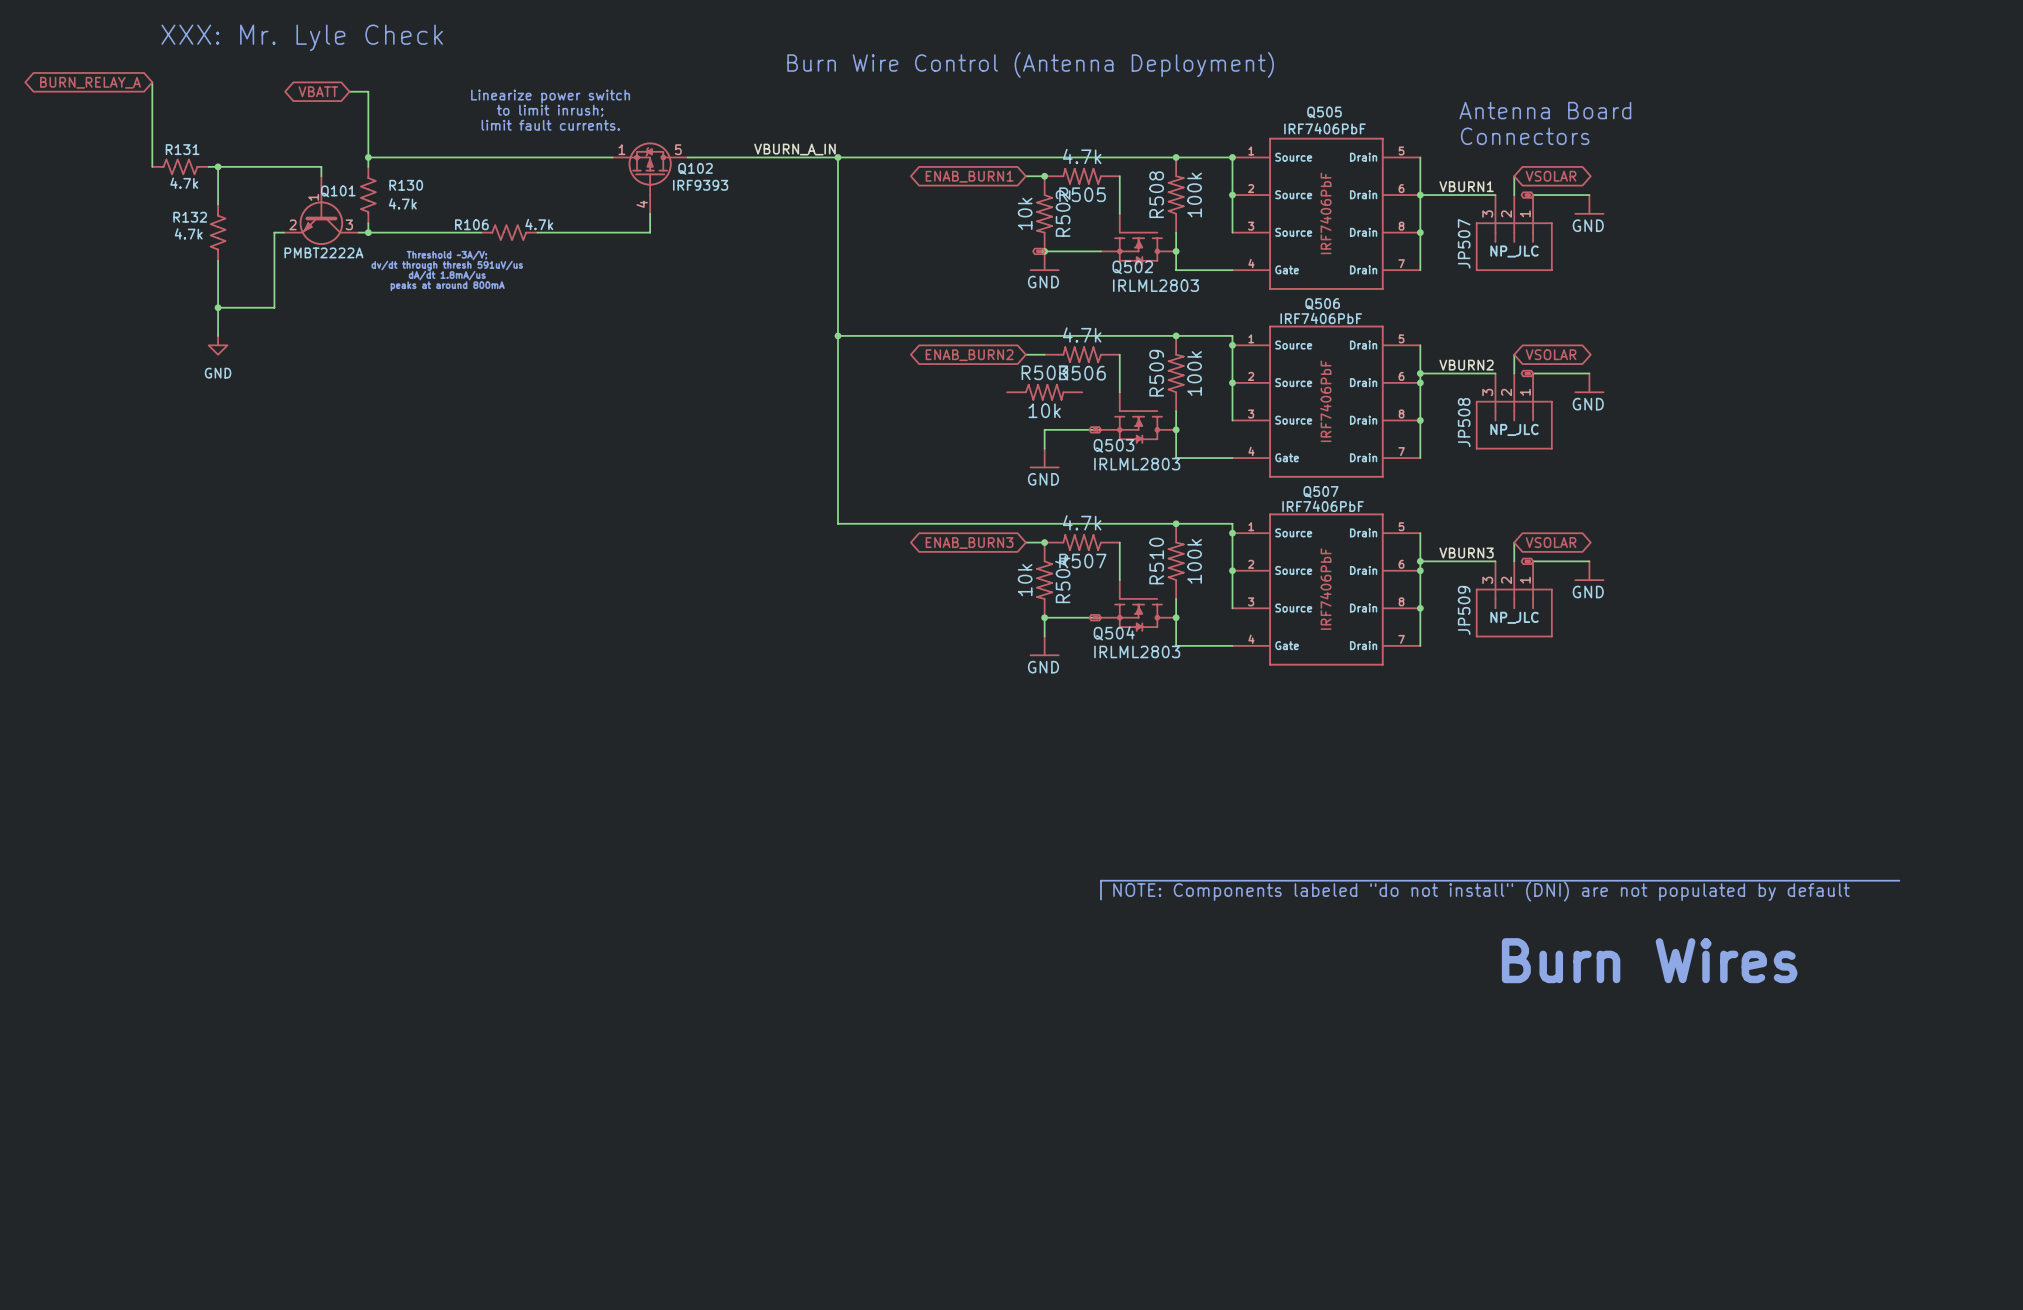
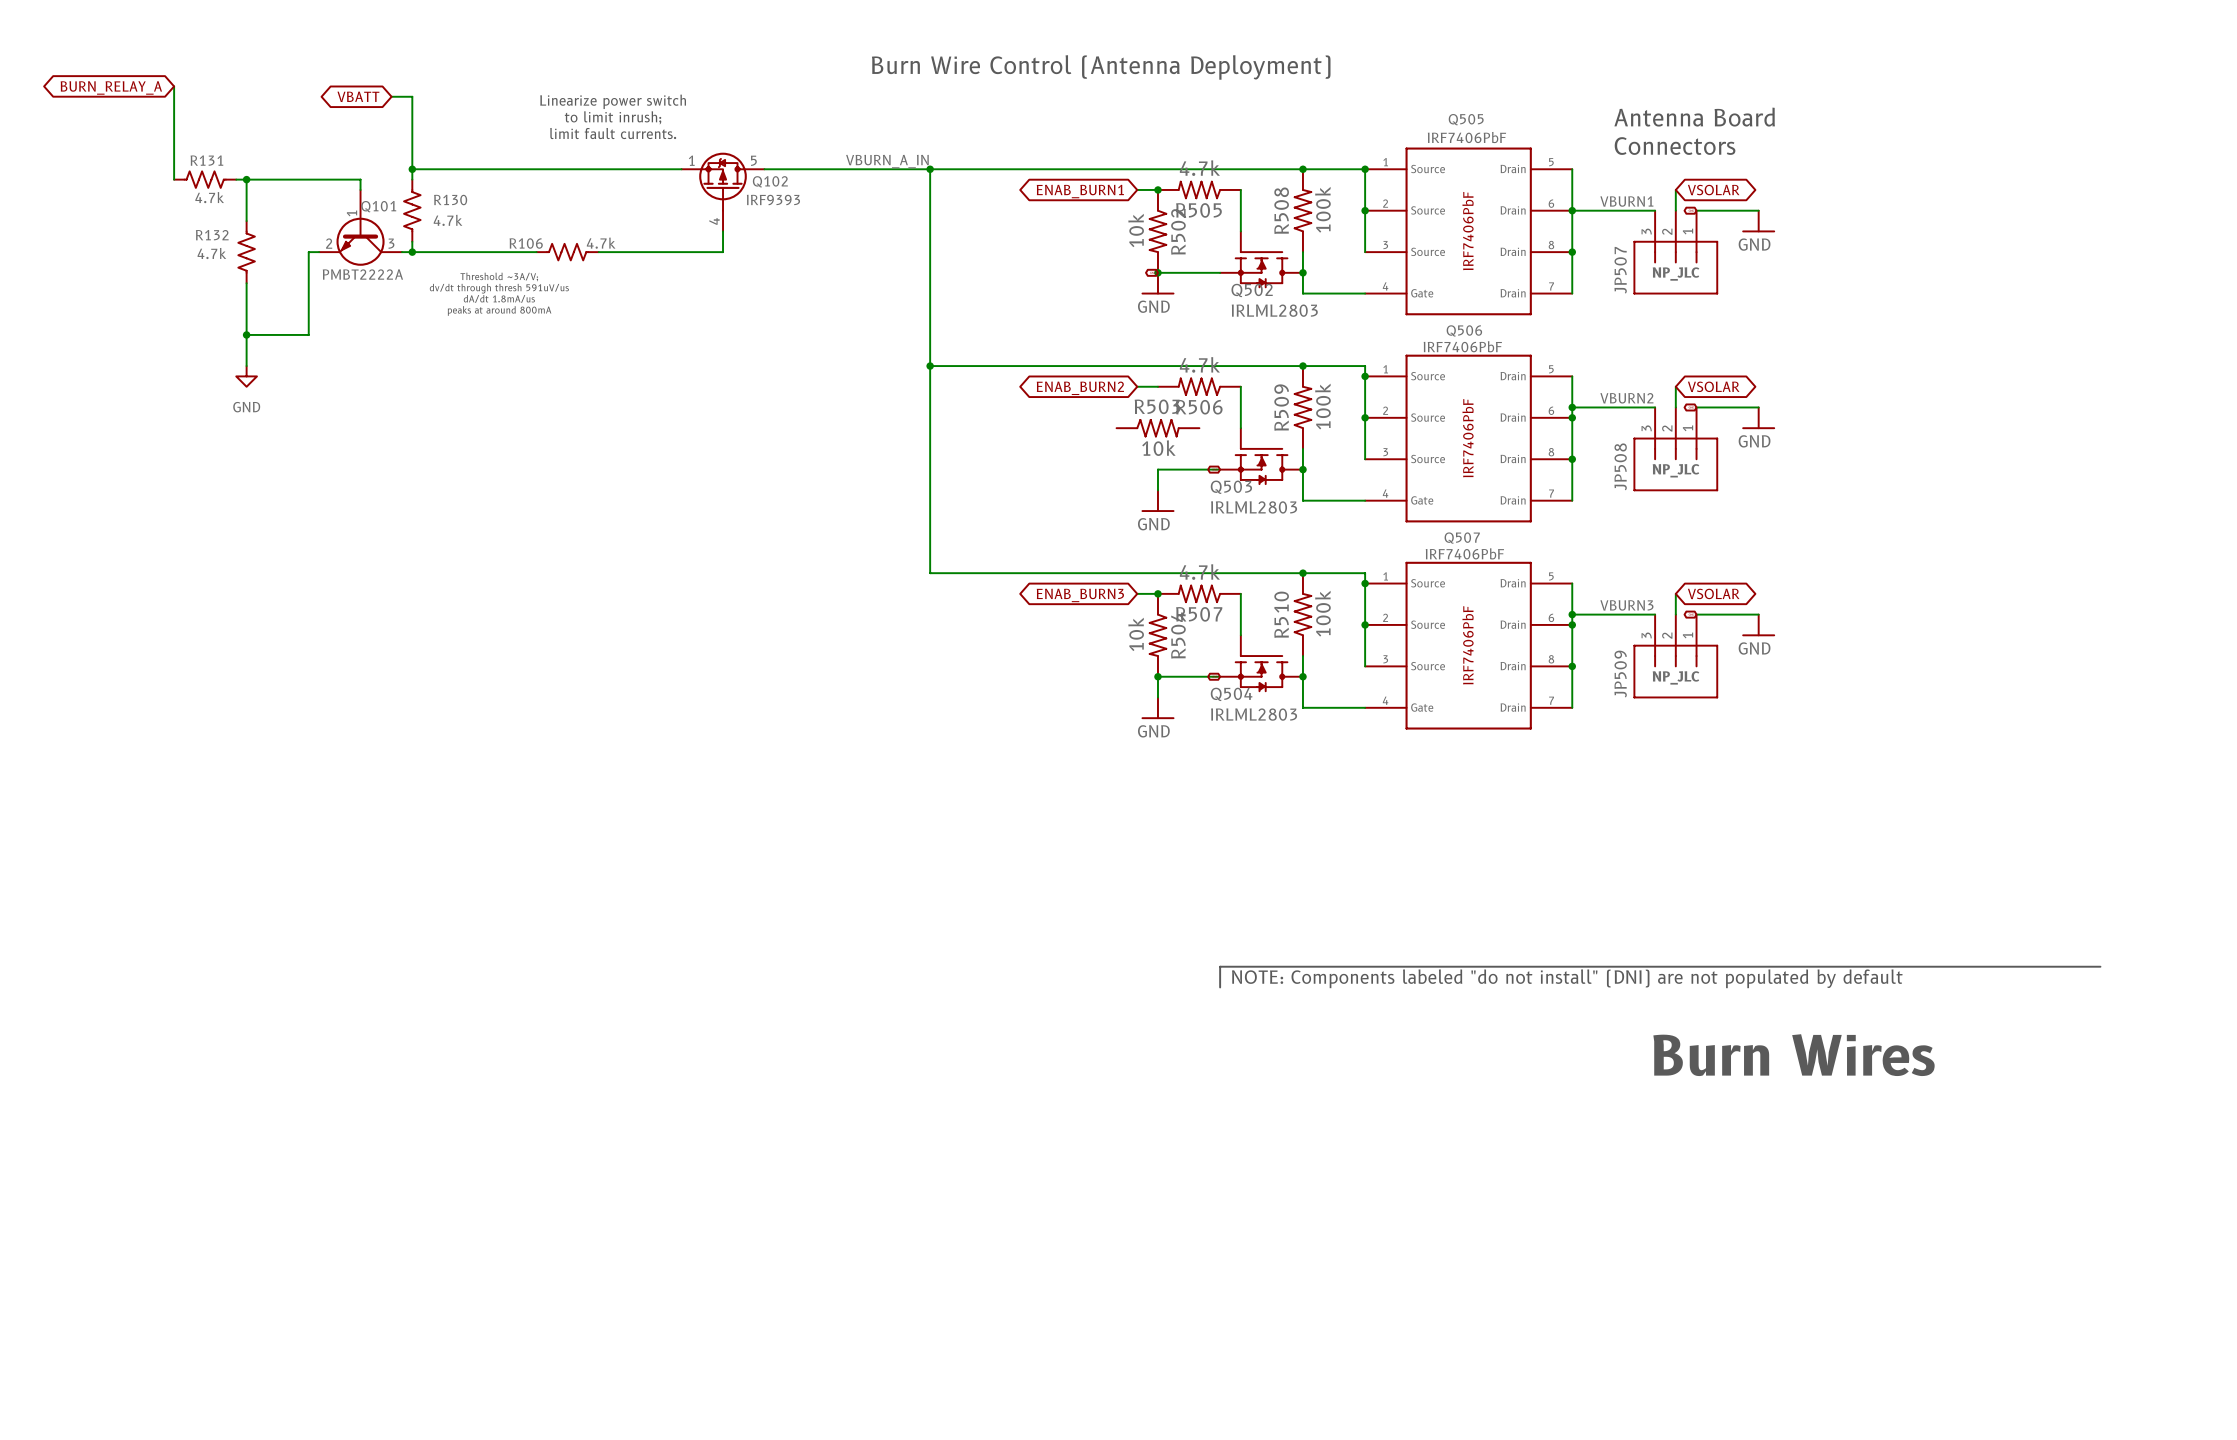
text: XXX: Mr. Lyle Check (302, 37) -> none

